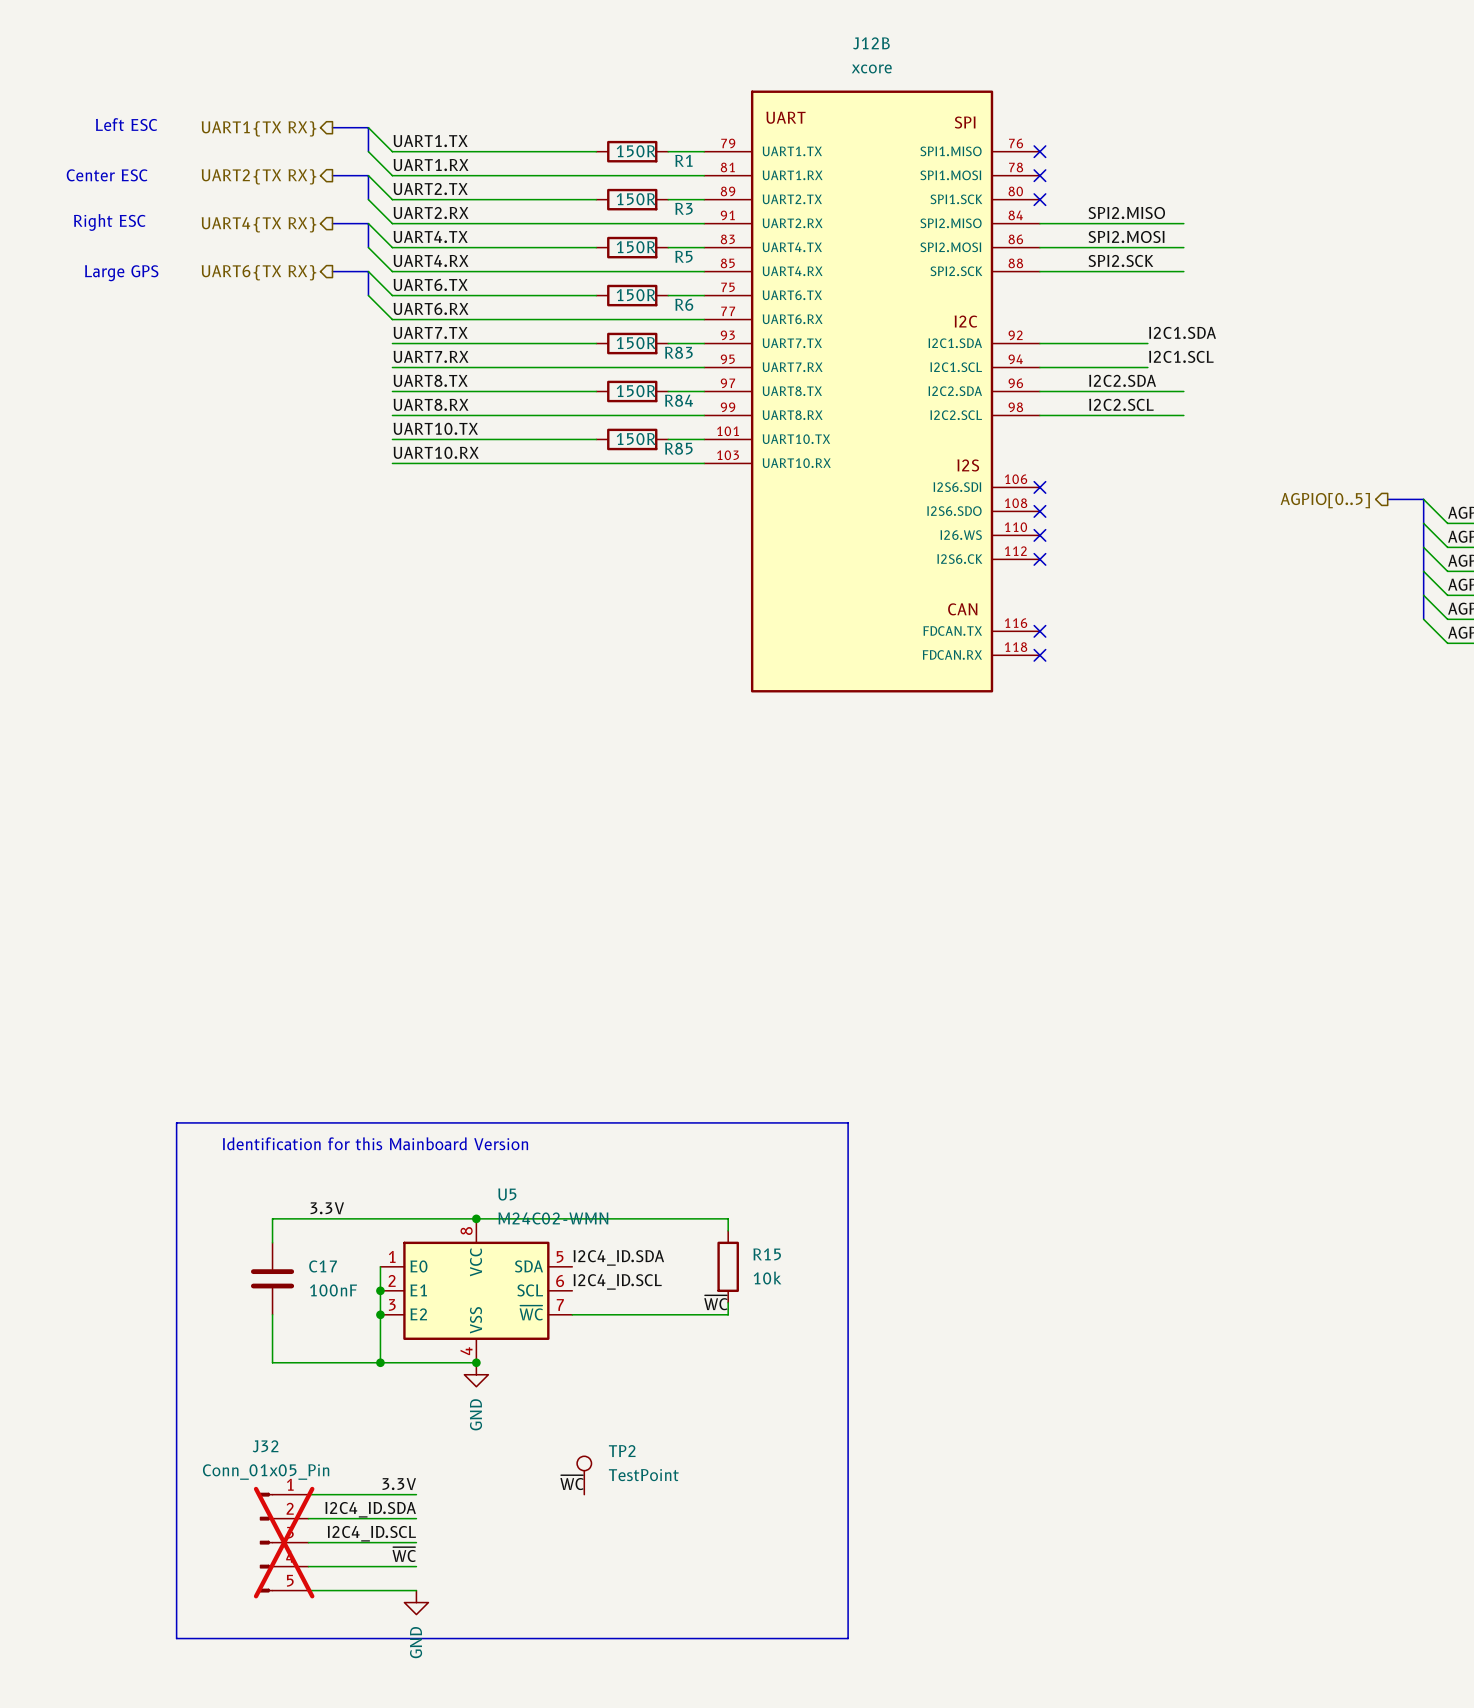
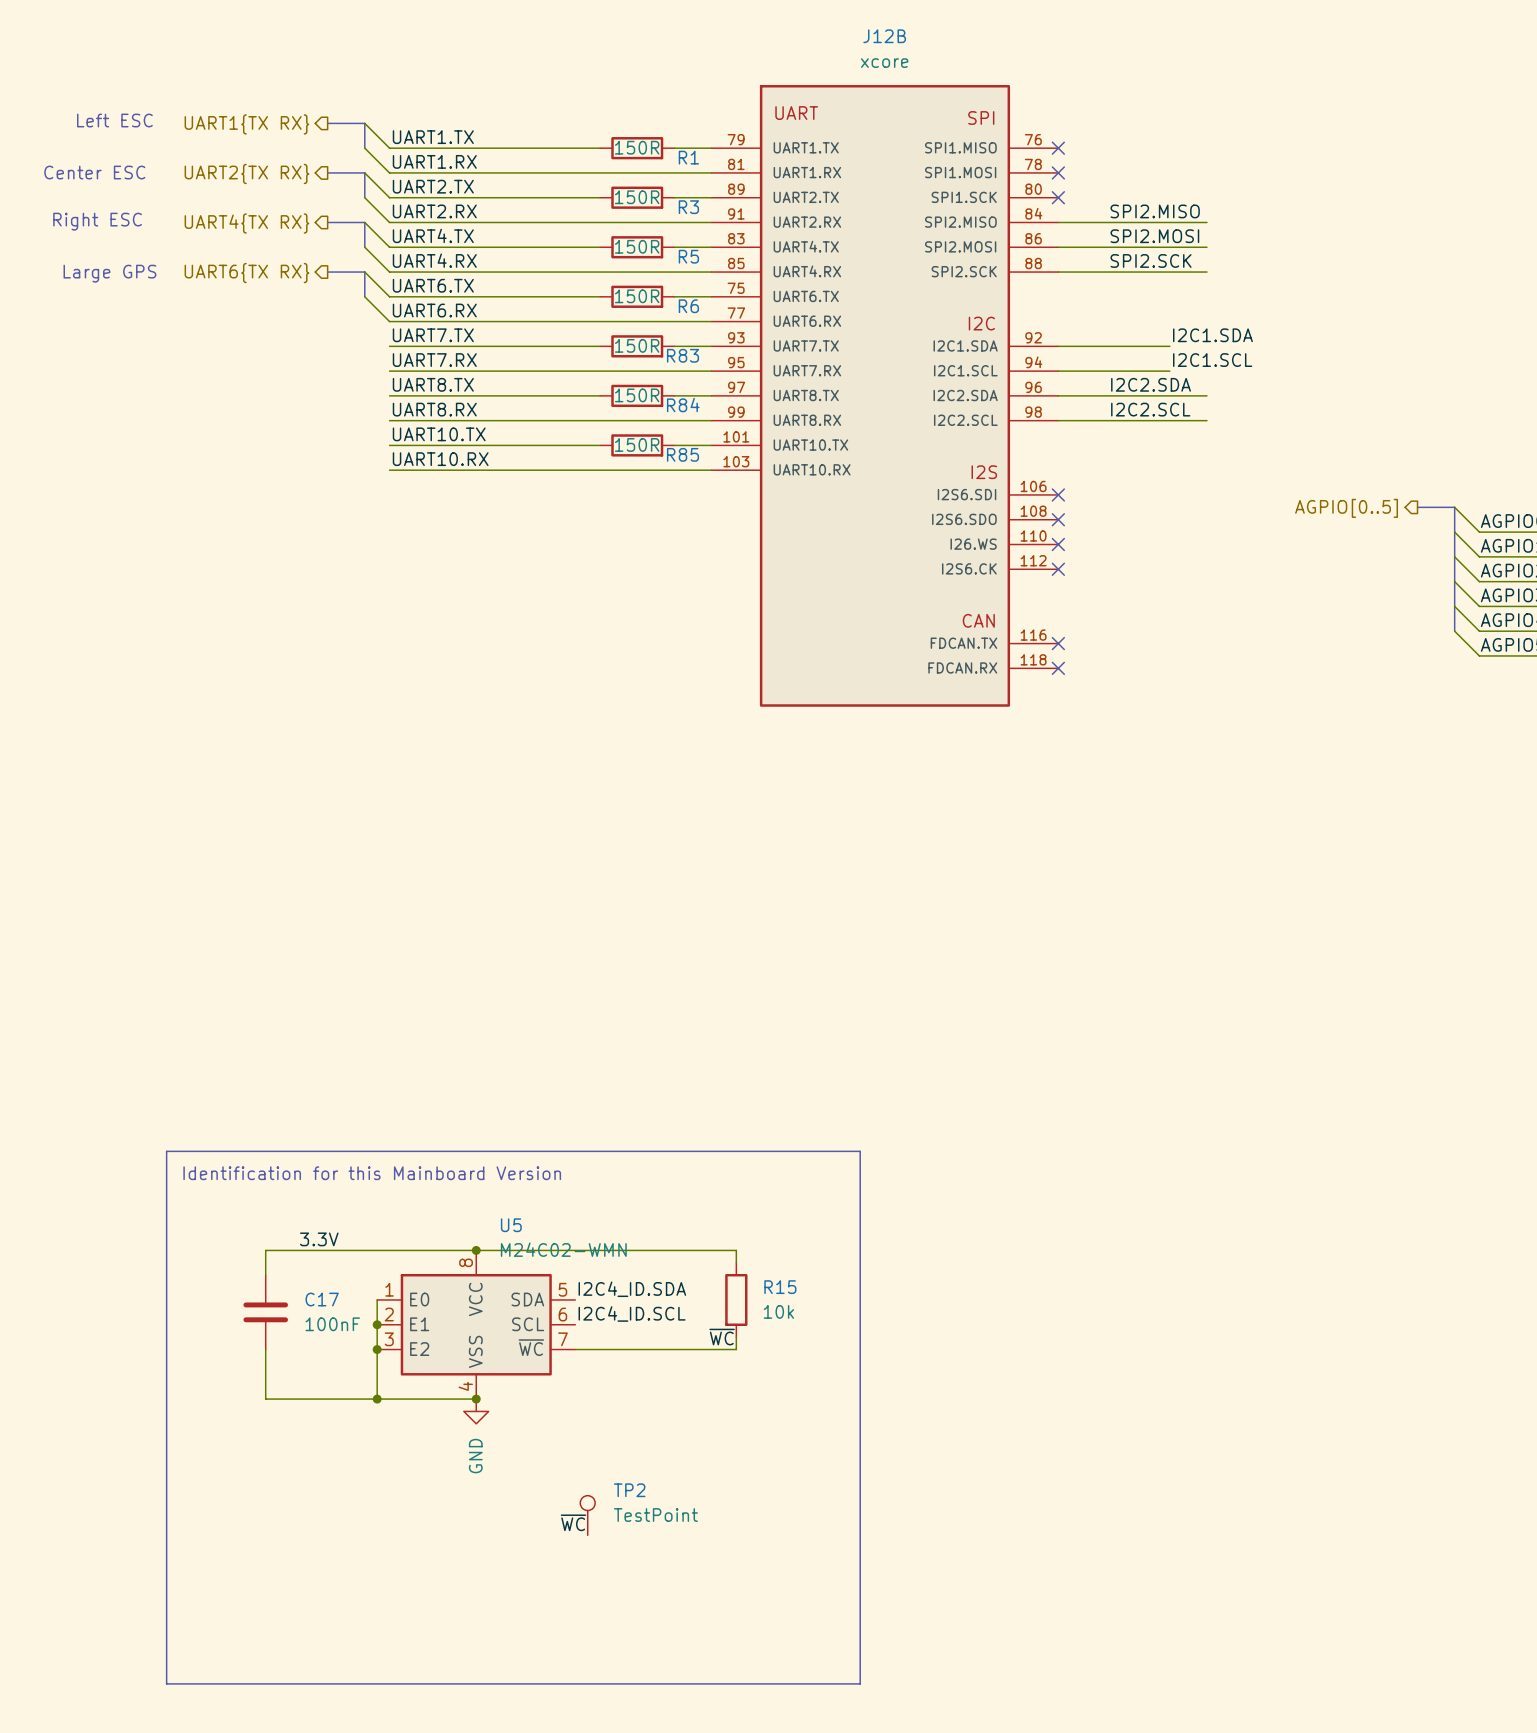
label: 3.3V (399, 1484) -> none
wire: (308, 1494) (416, 1494) -> none
label: I2C4_ID.SDA (370, 1509) -> none
wire: (308, 1518) (416, 1518) -> none
label: I2C4_ID.SCL (371, 1533) -> none
J32: Conn_01x05_Pin (284, 1542) -> none
wire: (308, 1542) (416, 1542) -> none
label: ~{WC} (404, 1554) -> none
wire: (308, 1566) (416, 1566) -> none
wire: (308, 1590) (416, 1590) -> none
power symbol: GND (416, 1602) -> none

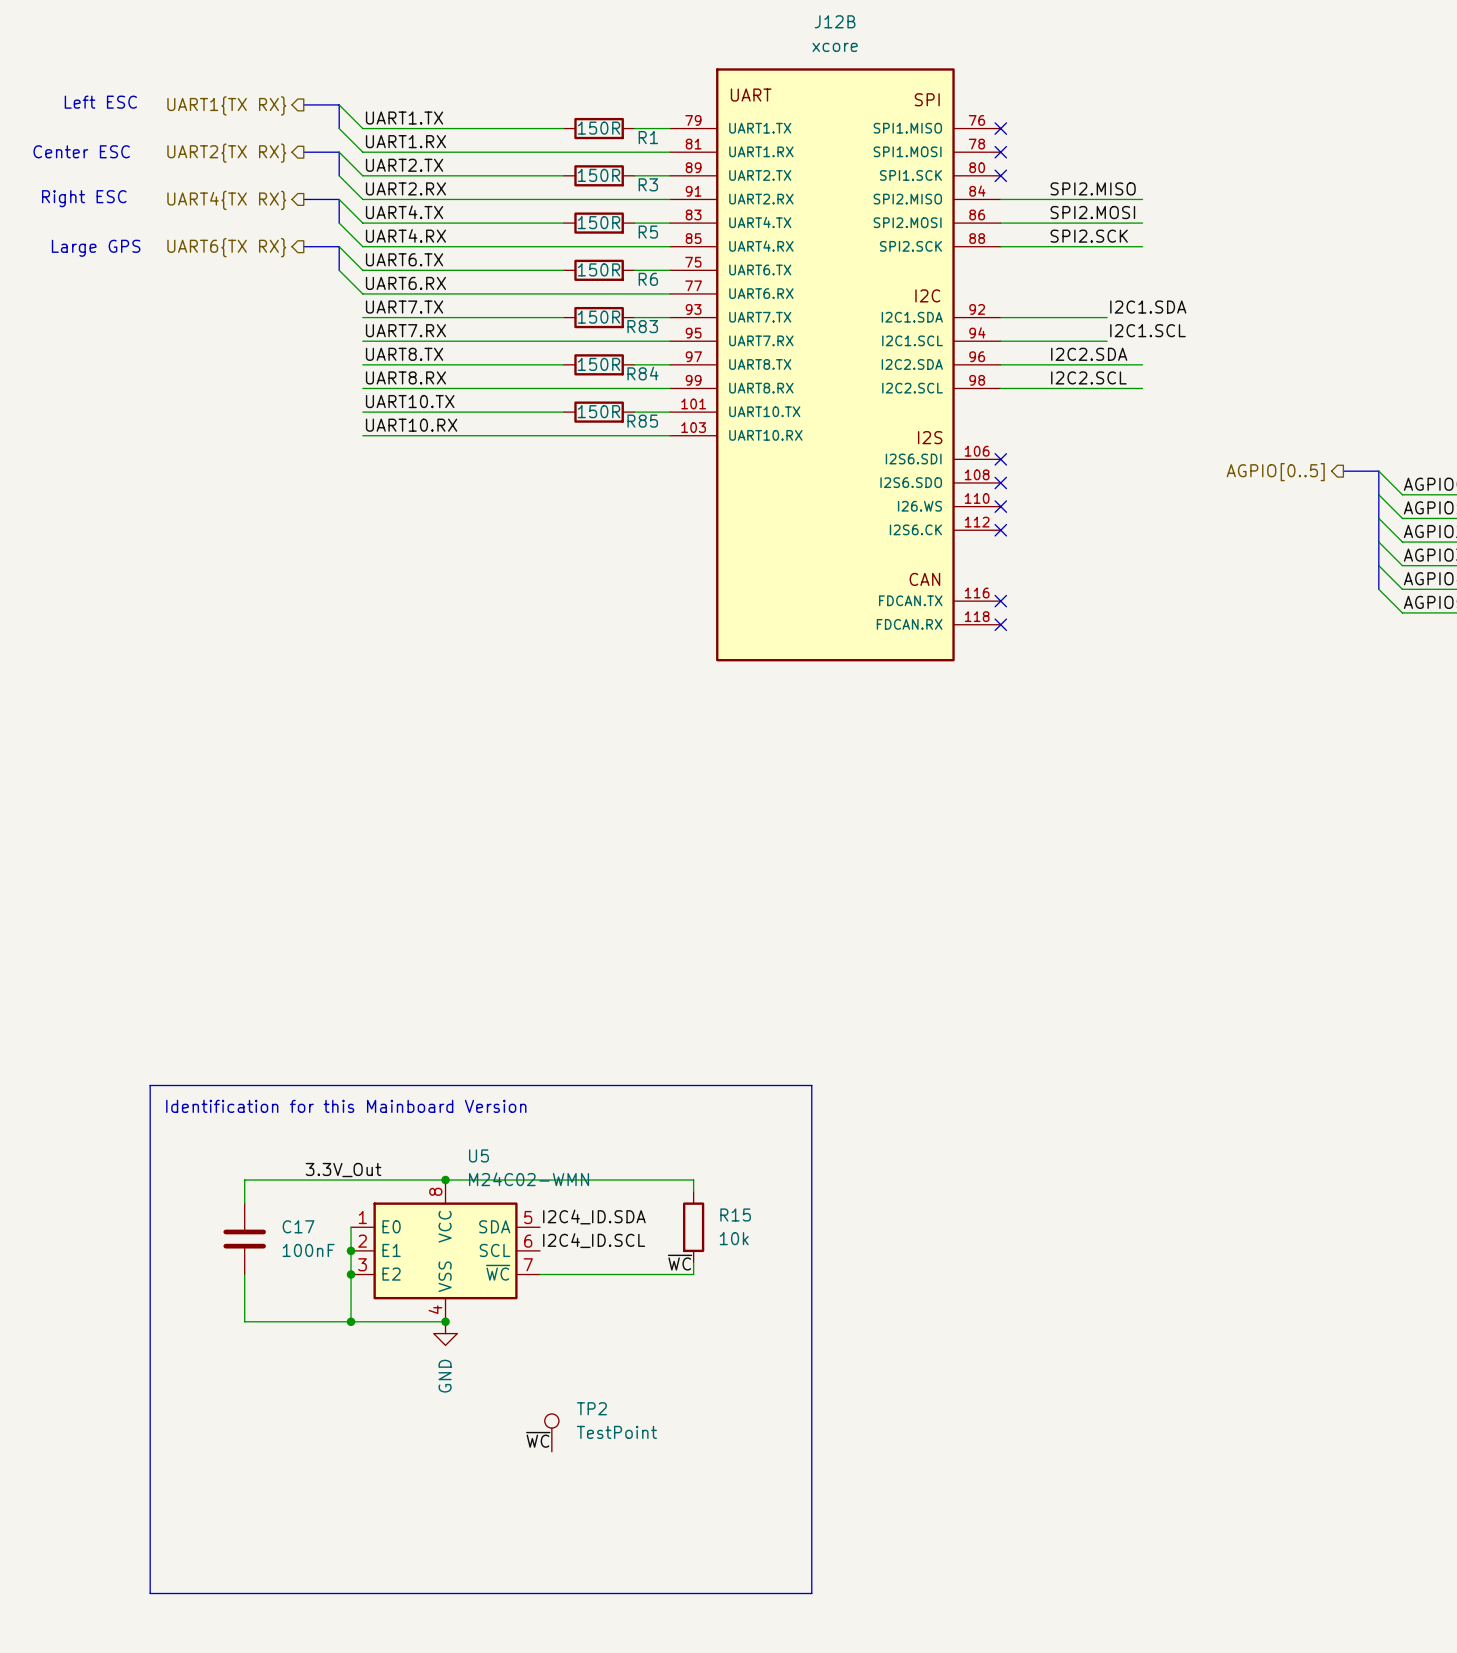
label: 3.3V (319, 1239) -> 3.3V_Out (343, 1170)

